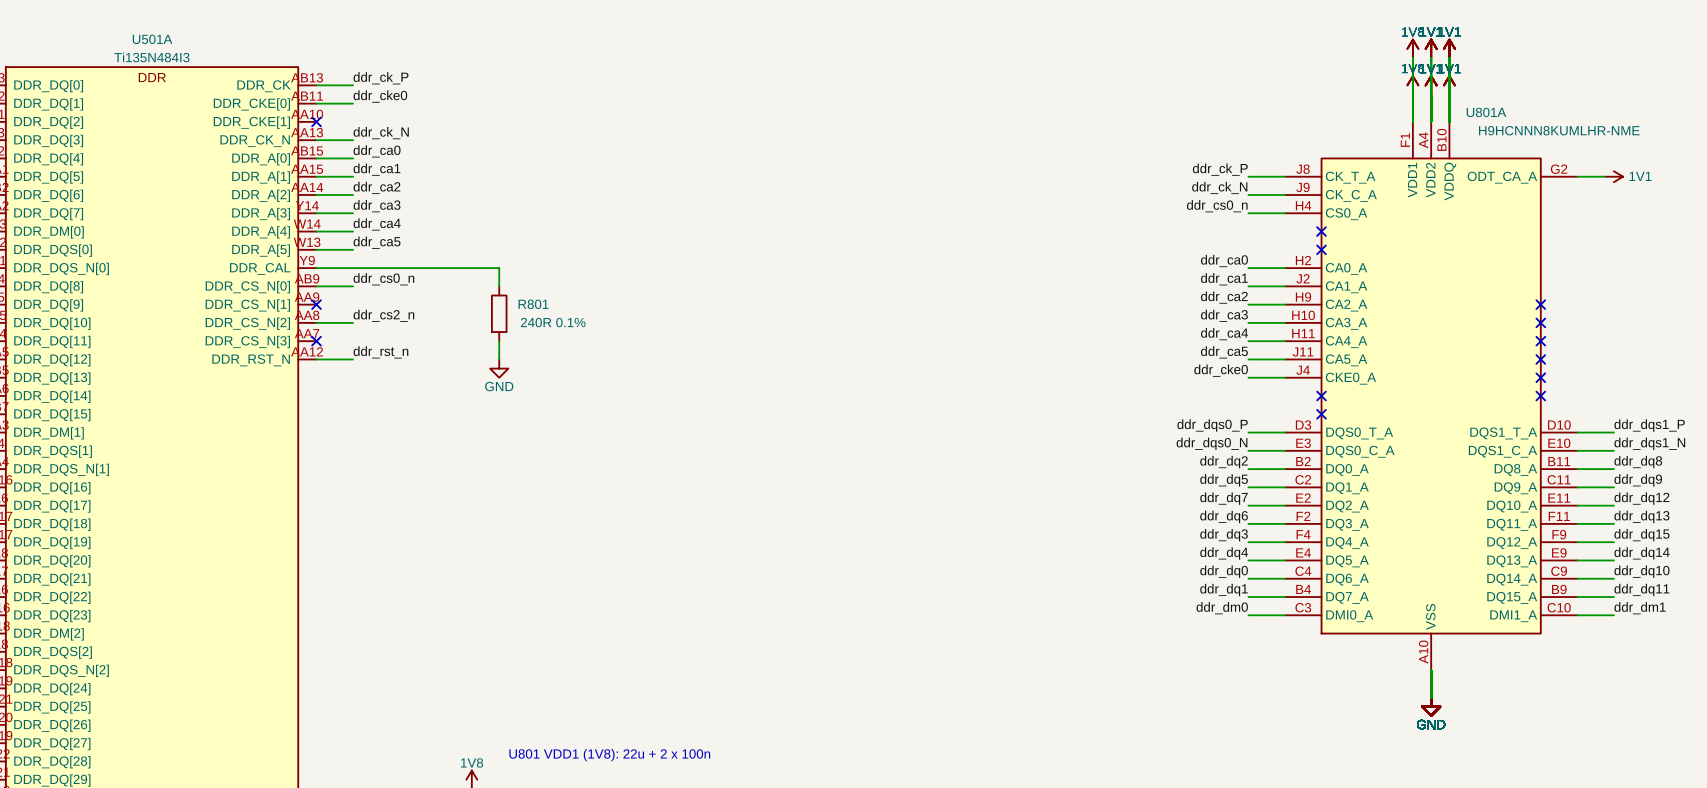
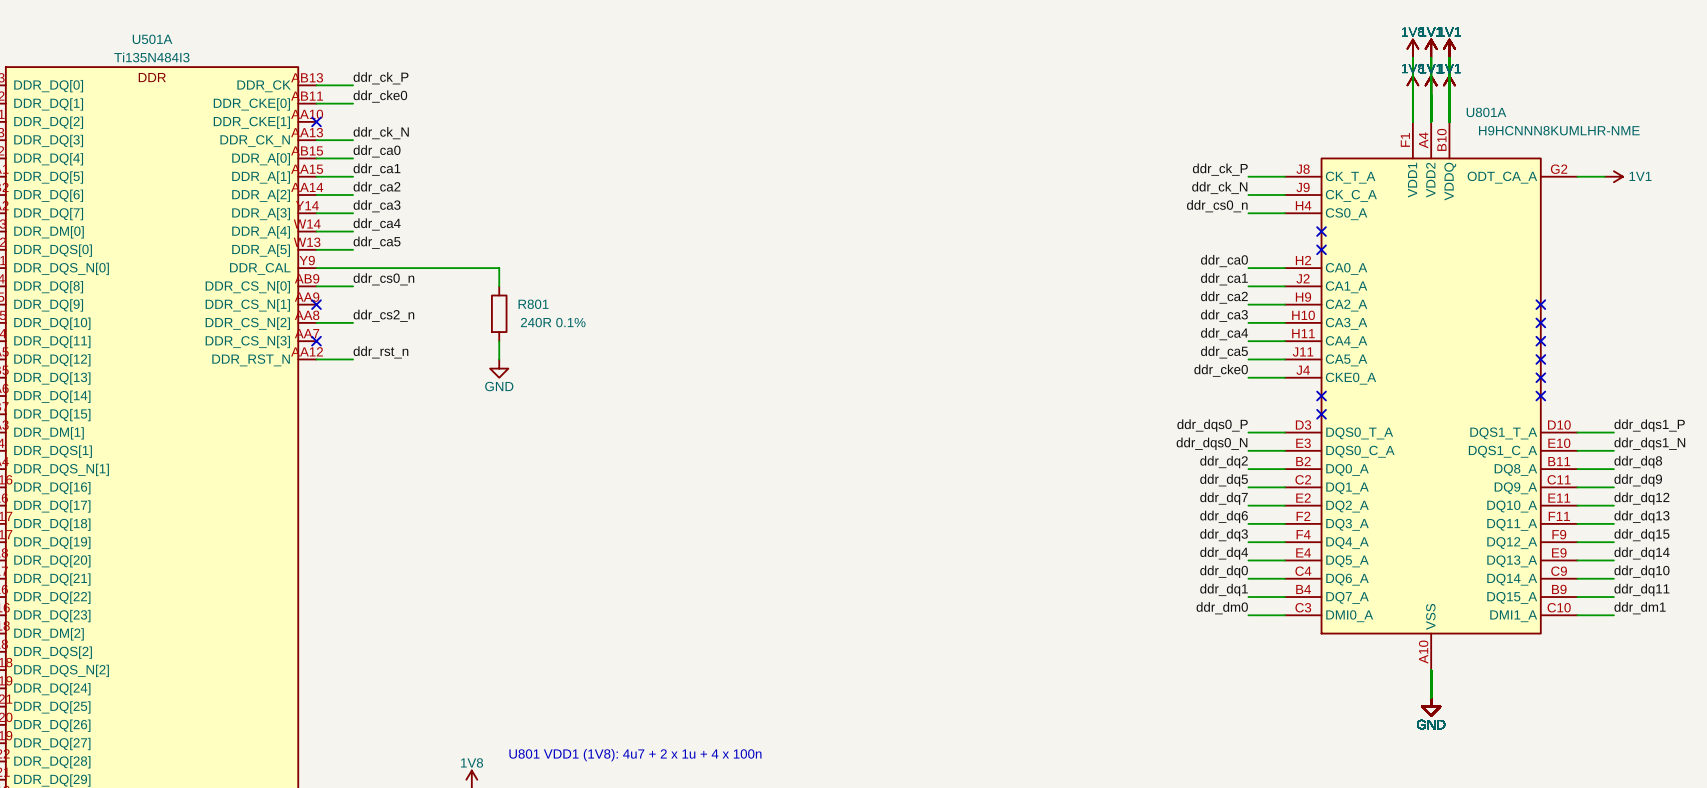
text: U801 VDD1 (1V8): 22u + 2 x 100n (609, 755) -> U801 VDD1 (1V8): 4u7 + 2 x 1u + 4 x 100n (635, 755)

